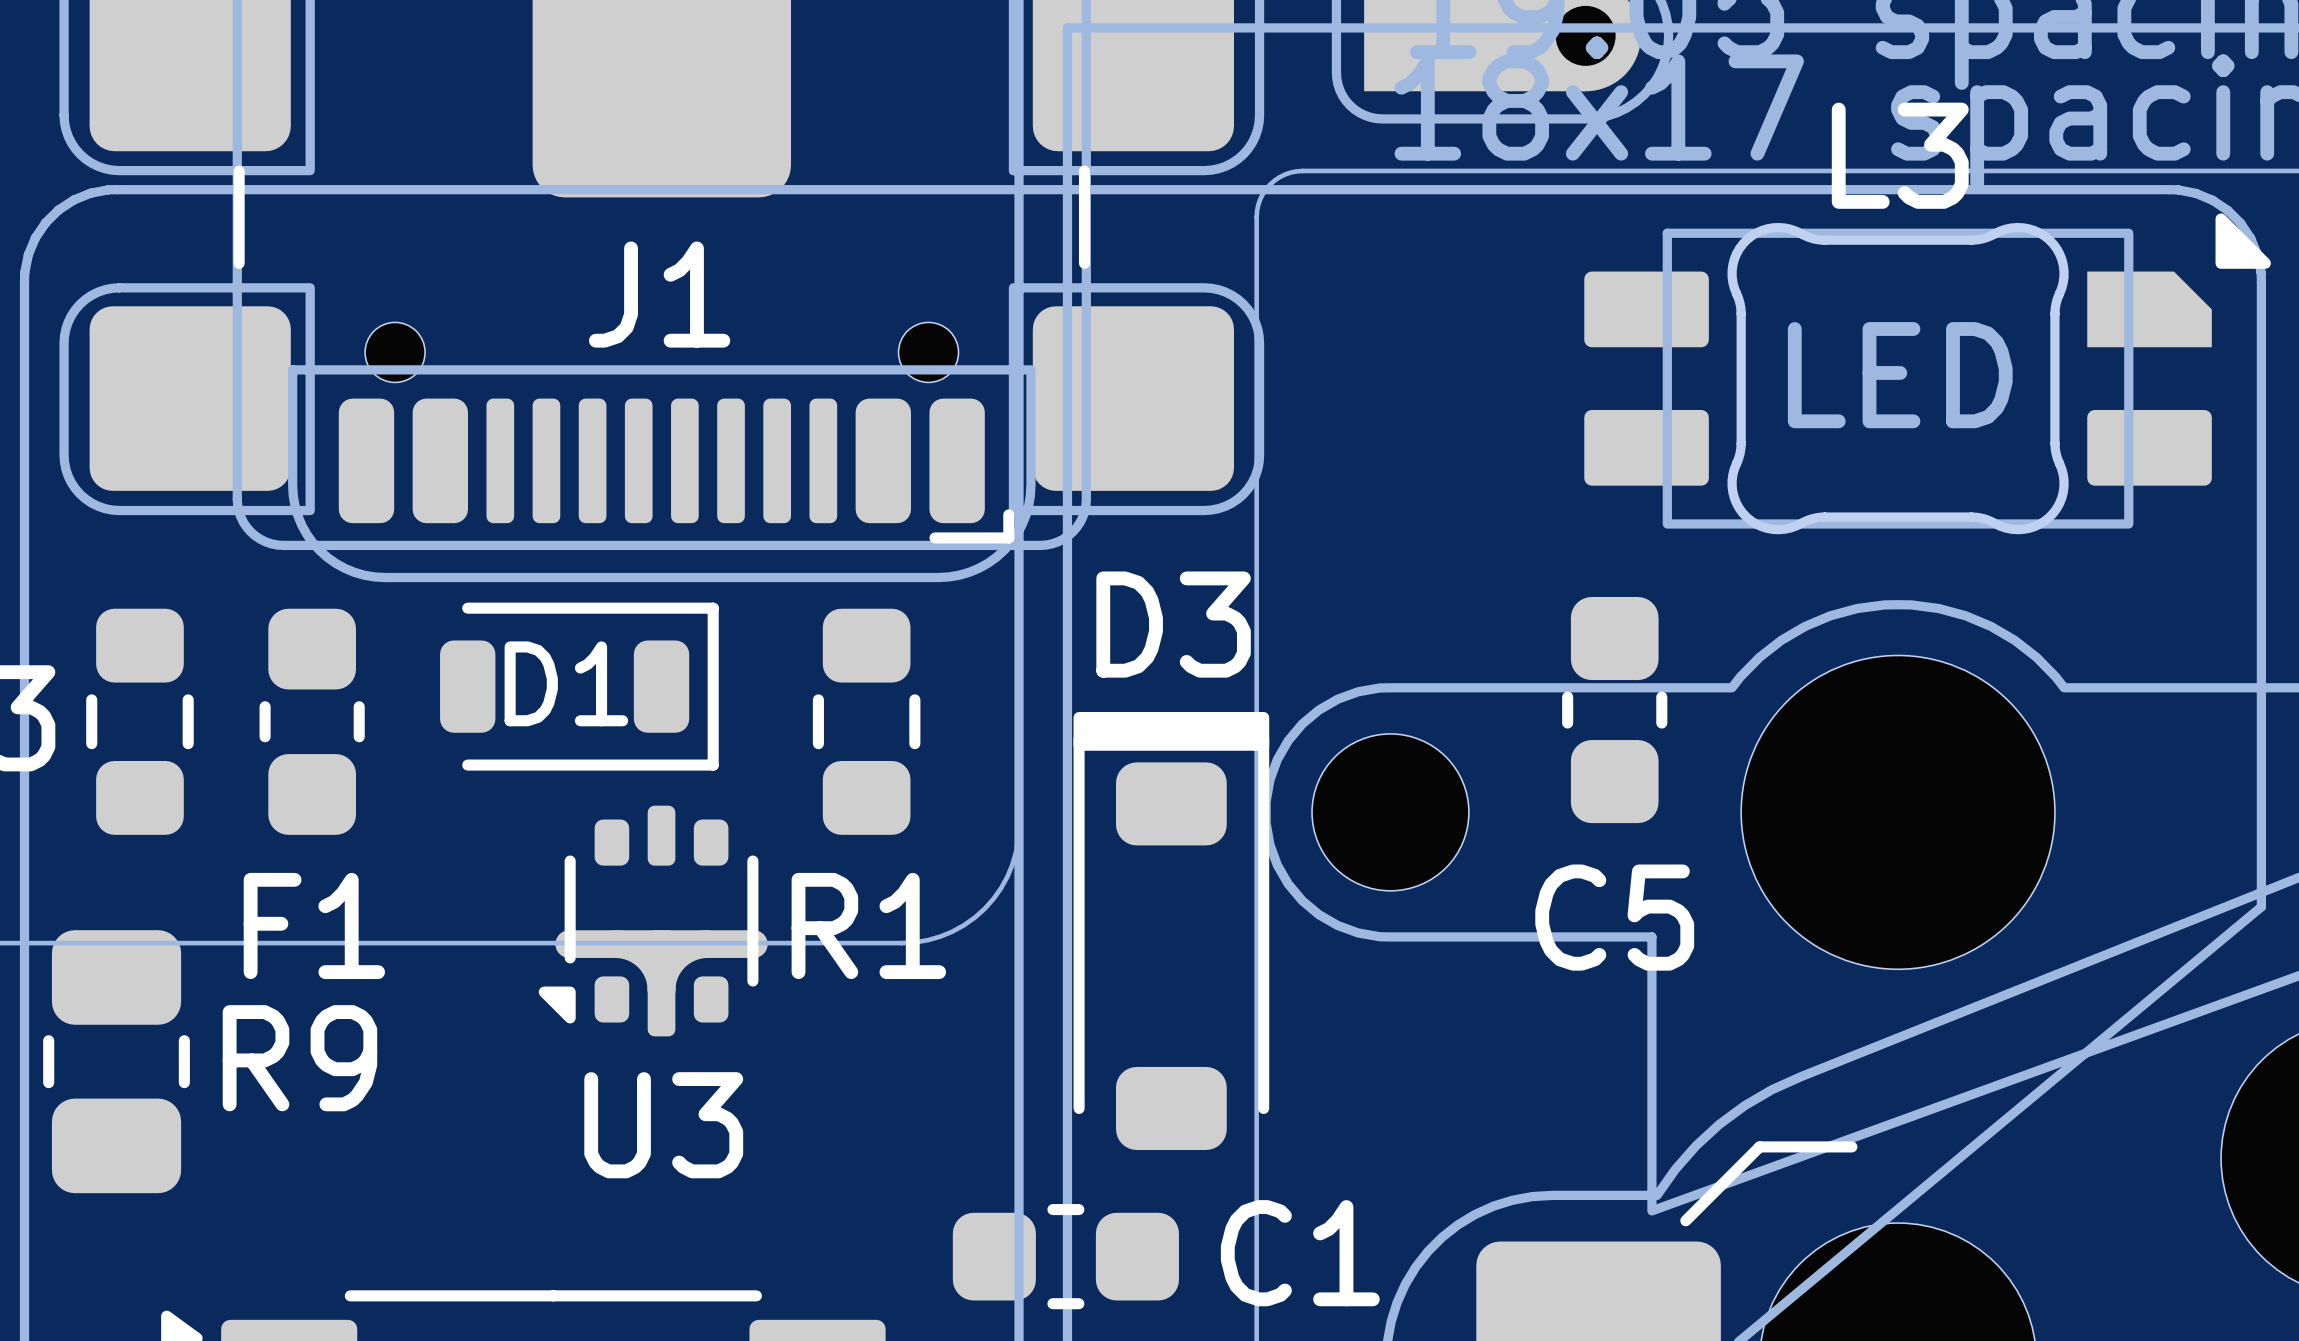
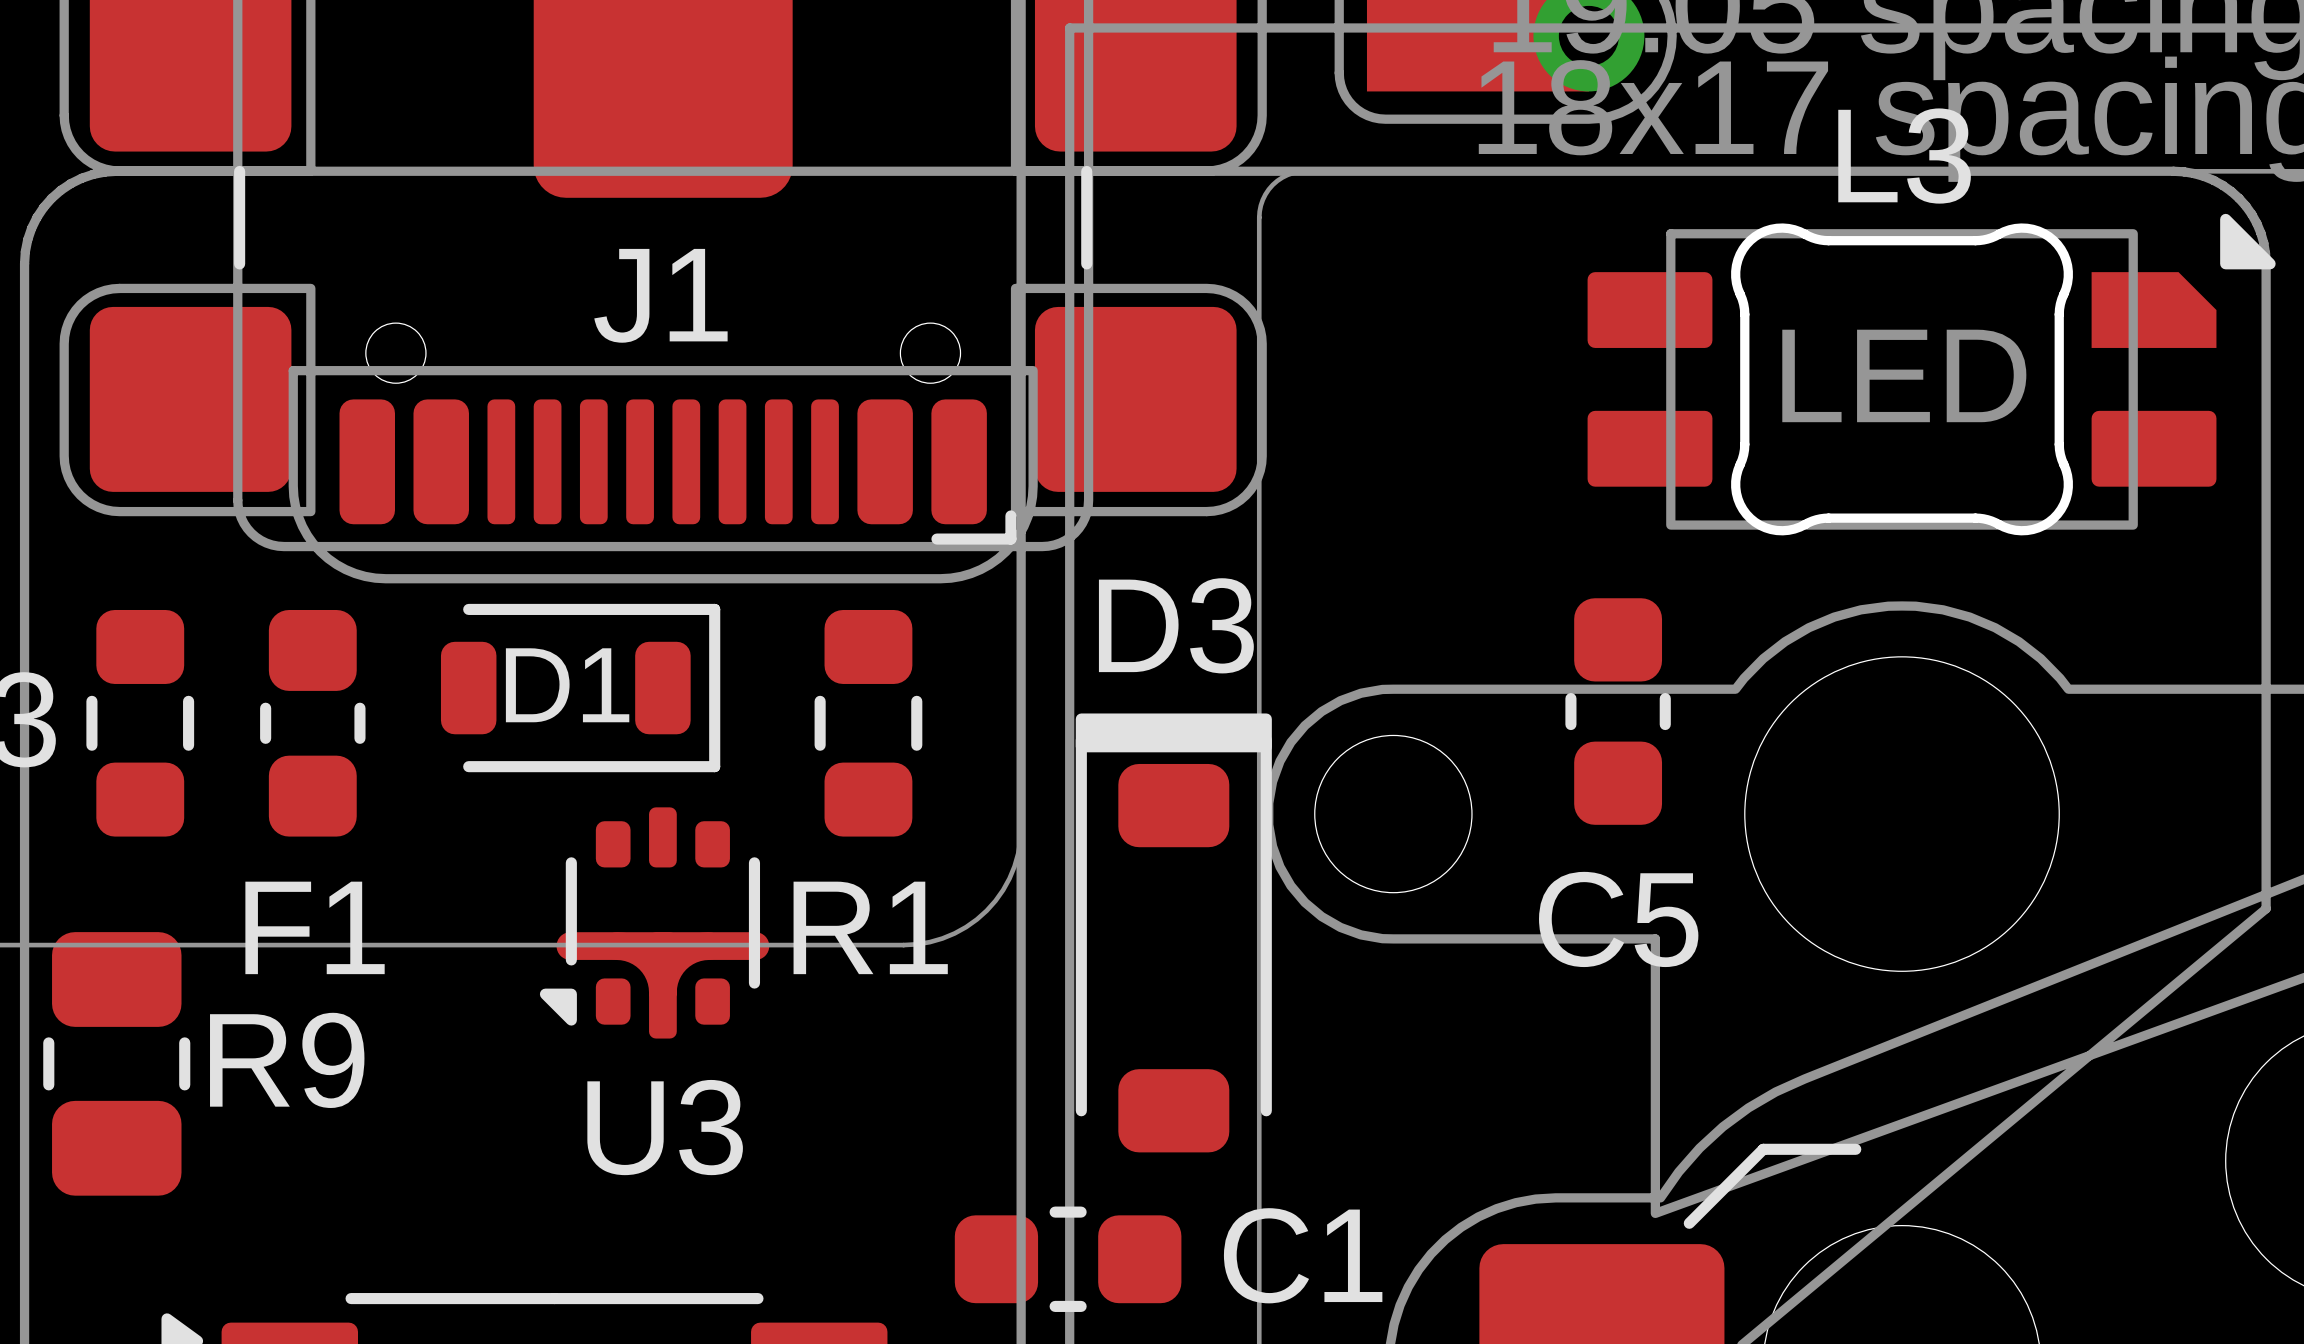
line: (24, 281) (28, 254) (35, 238) (45, 222) (58, 210) (73, 200) (90, 193) (117, 189) (2178, 189) (2195, 193) (2212, 200) (2227, 210) (2240, 223) (2250, 238) (2257, 255) (2261, 281) -> (24, 282) (27, 239) (36, 217) (43, 207) (60, 190) (81, 178) (104, 172) (117, 171) (2173, 171) (2194, 173) (2213, 180) (2231, 191) (2245, 206) (2256, 223) (2263, 243) (2266, 282)

